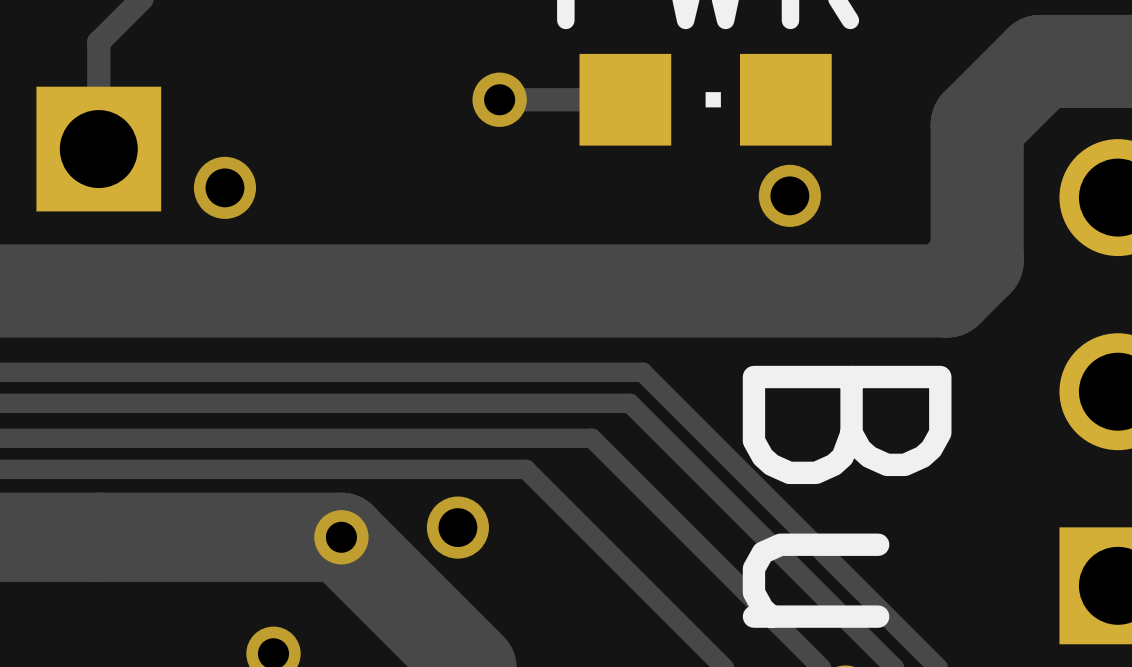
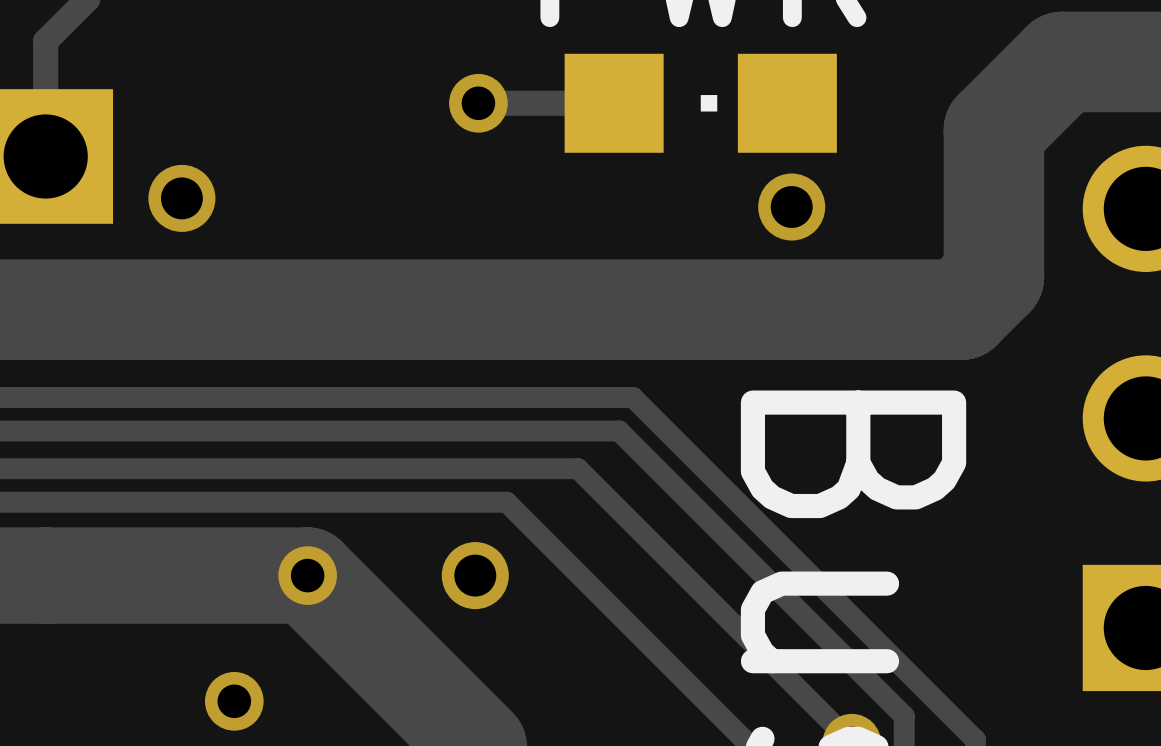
via position: (457, 527) -> (475, 575)

